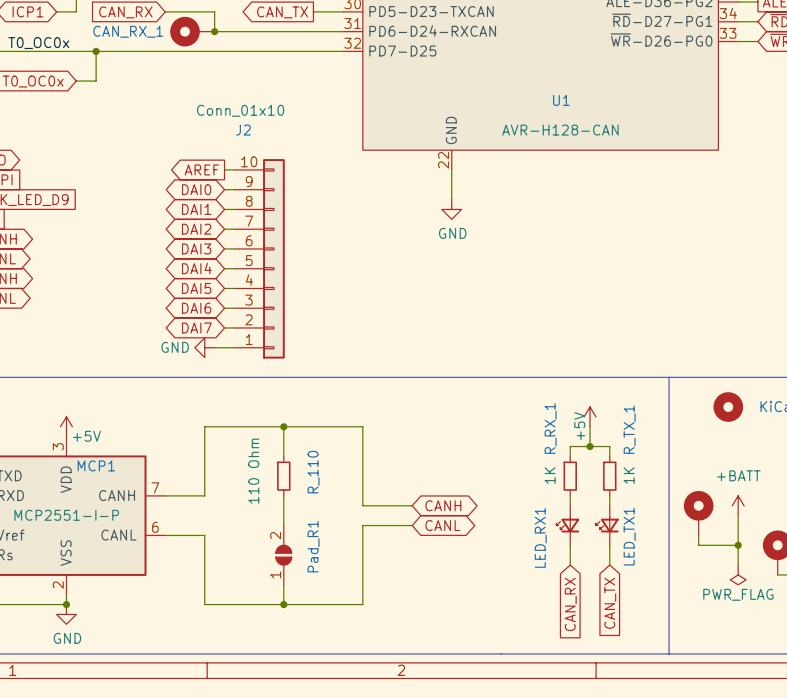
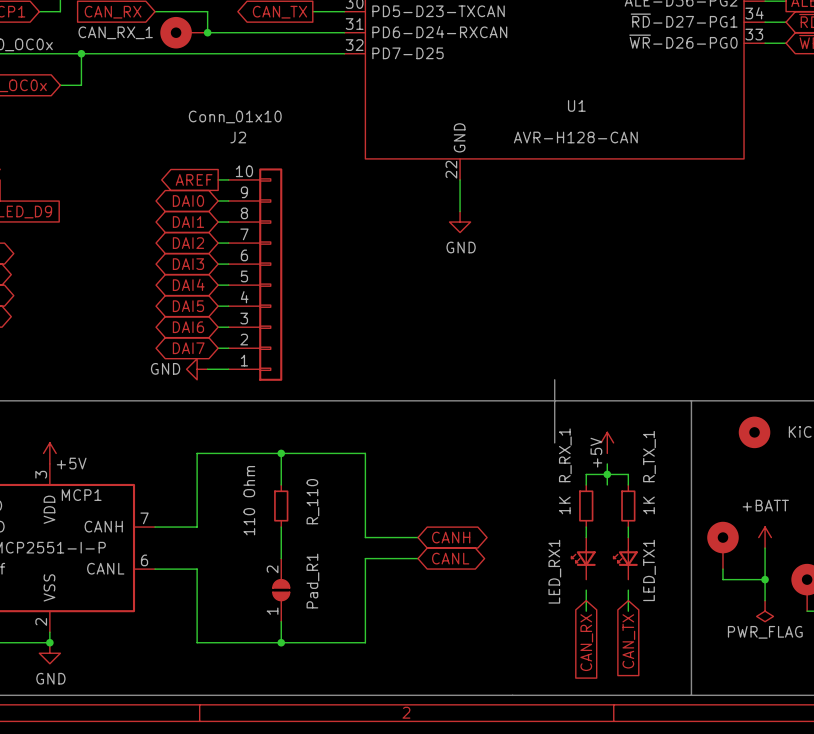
line: none -> (554, 379) (554, 442)
wire: (590, 426) (590, 436) -> (607, 474) (607, 484)
wire: (570, 545) (570, 555) -> (586, 600) (586, 611)
wire: (609, 545) (609, 555) -> (628, 600) (628, 611)

